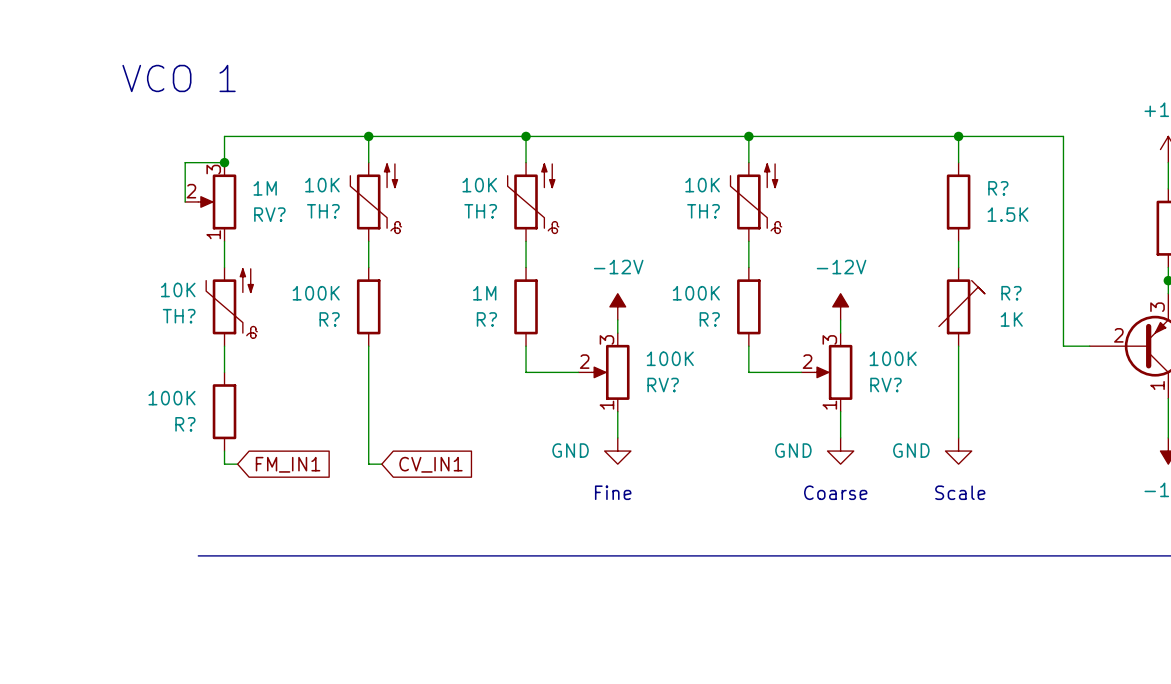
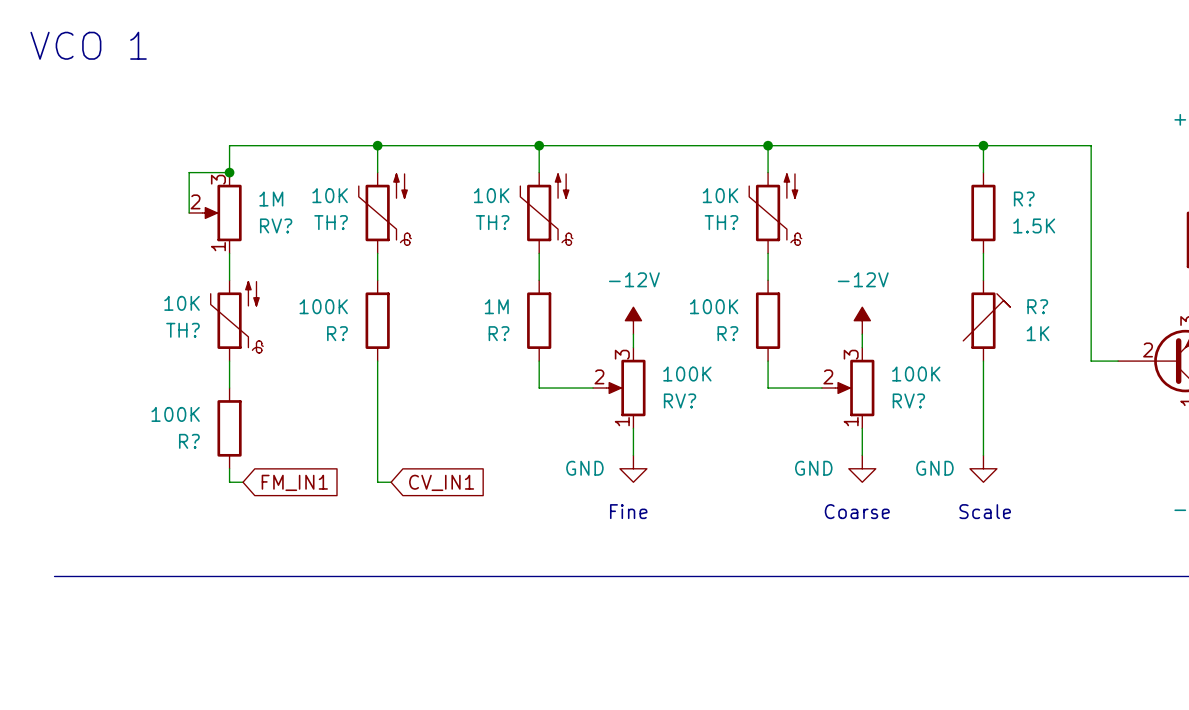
text position: VCO 1 (179, 78) -> VCO 1 (88, 45)
line: none -> (54, 576) (202, 576)

